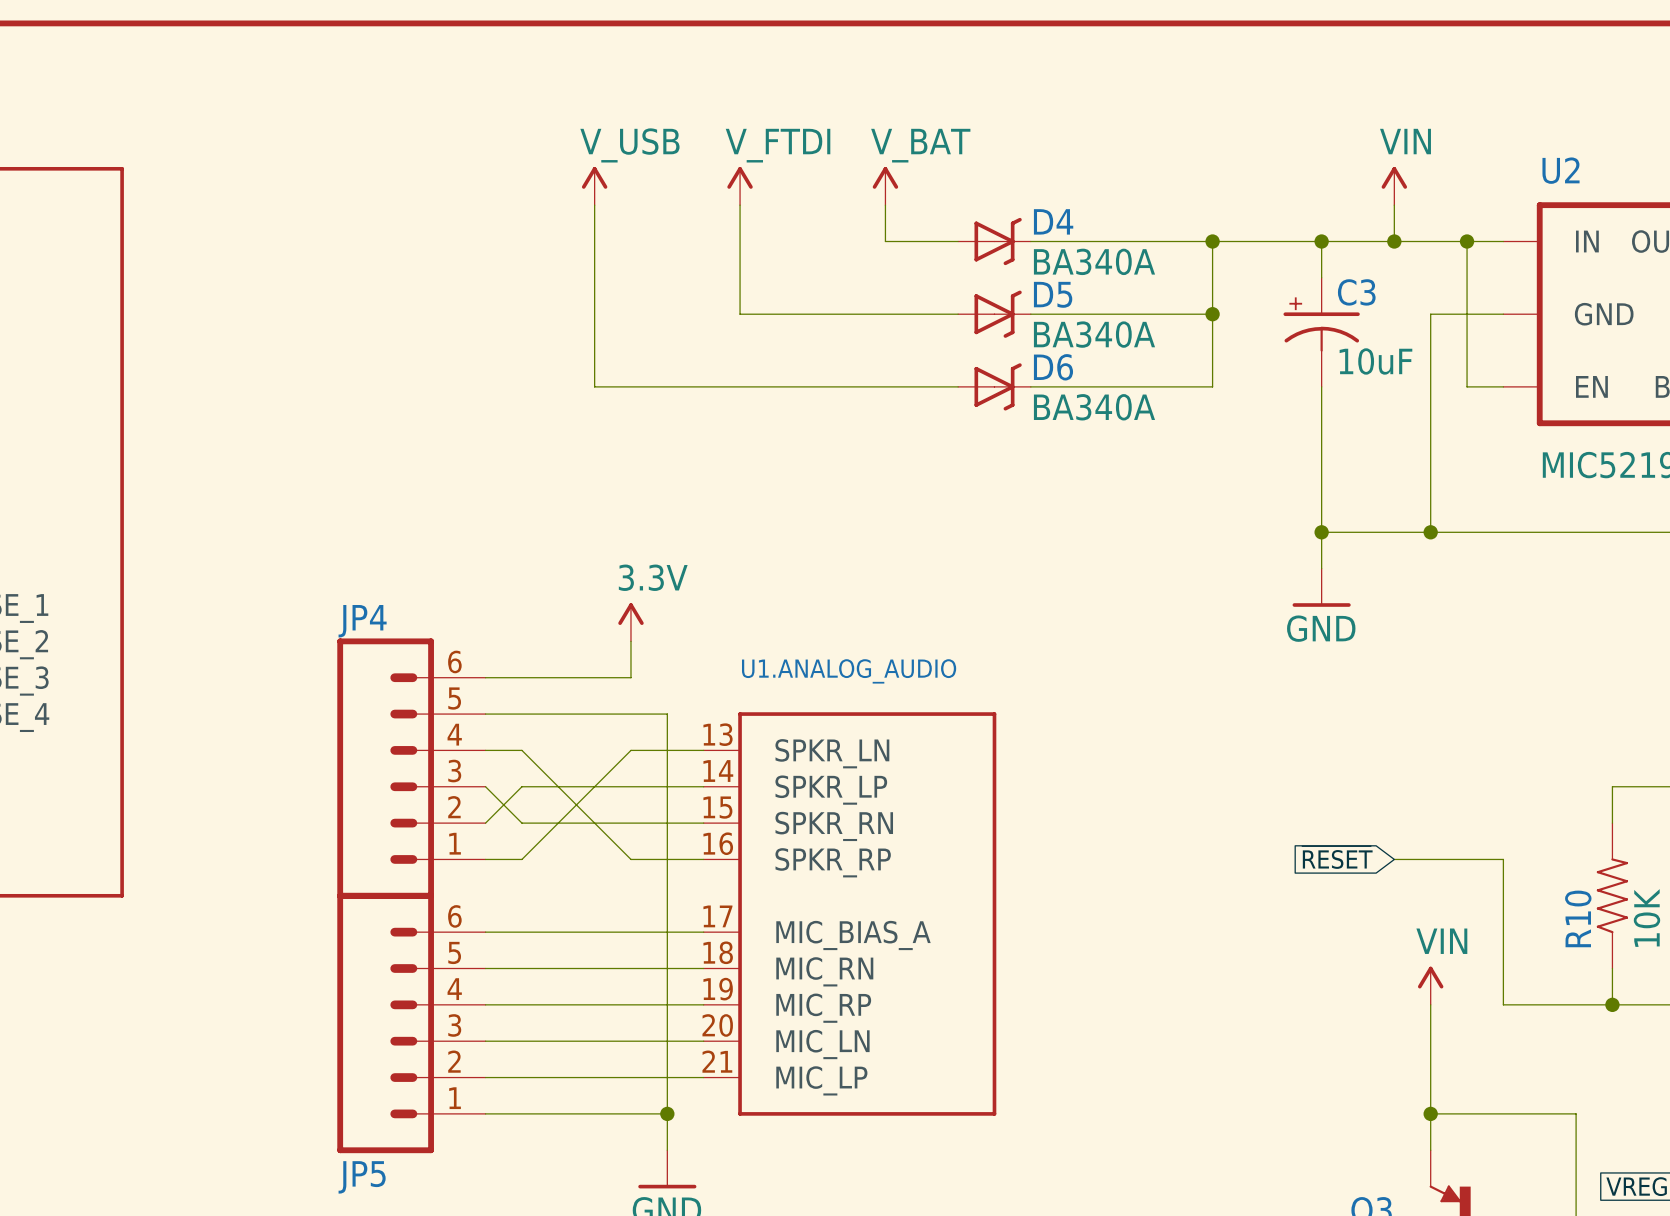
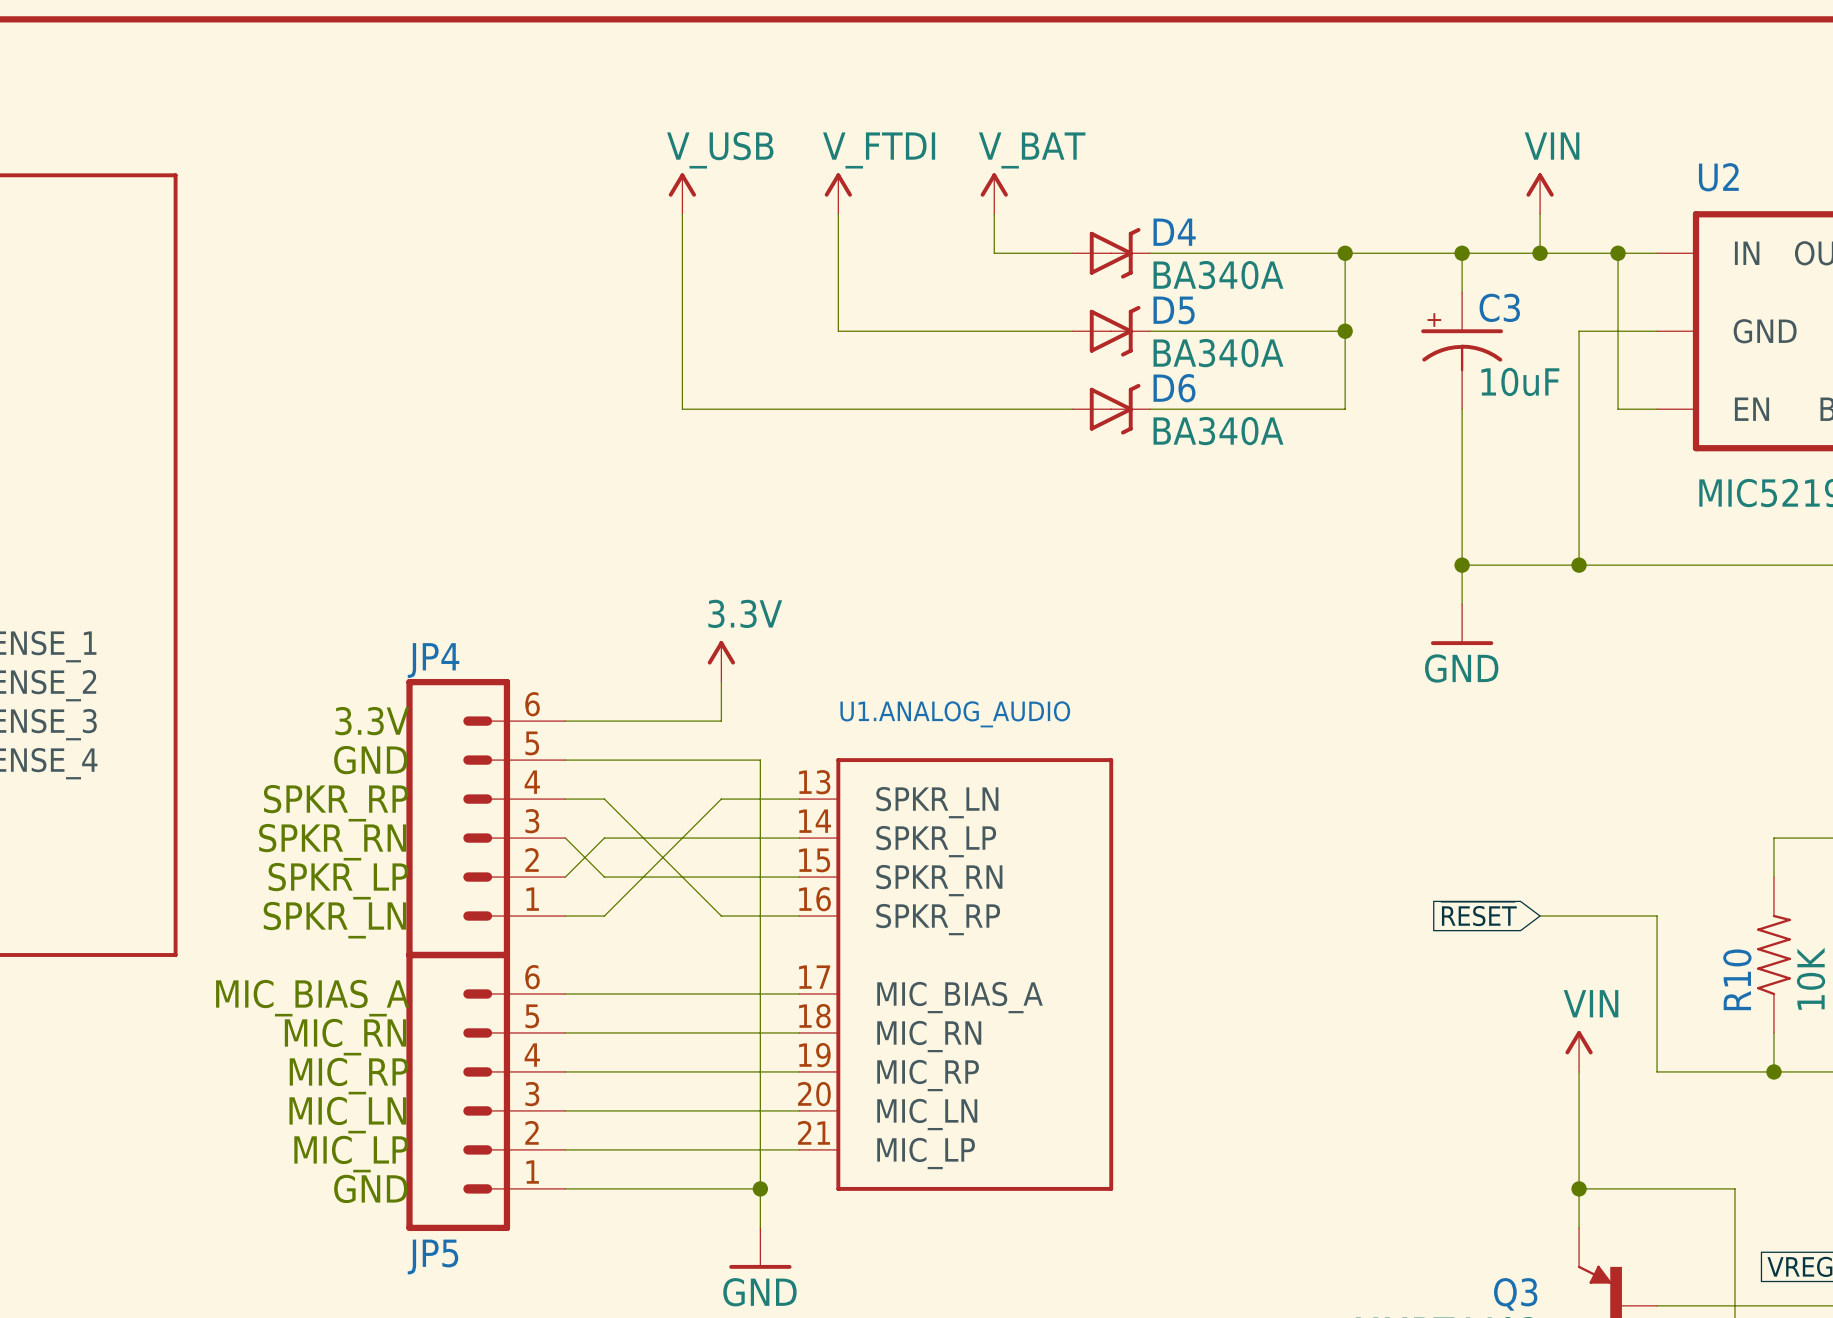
text: none -> 3.3V (372, 721)
text: none -> GND (370, 760)
text: none -> SPKR_RP (336, 803)
text: none -> SPKR_RN (332, 842)
text: none -> SPKR_LP (338, 881)
text: none -> SPKR_LN (334, 920)
text: none -> MIC_BIAS_A (312, 998)
text: none -> MIC_RN (345, 1037)
text: none -> MIC_RP (349, 1076)
text: none -> MIC_LN (347, 1115)
text: none -> MIC_LP (351, 1154)
text: none -> GND (370, 1188)

